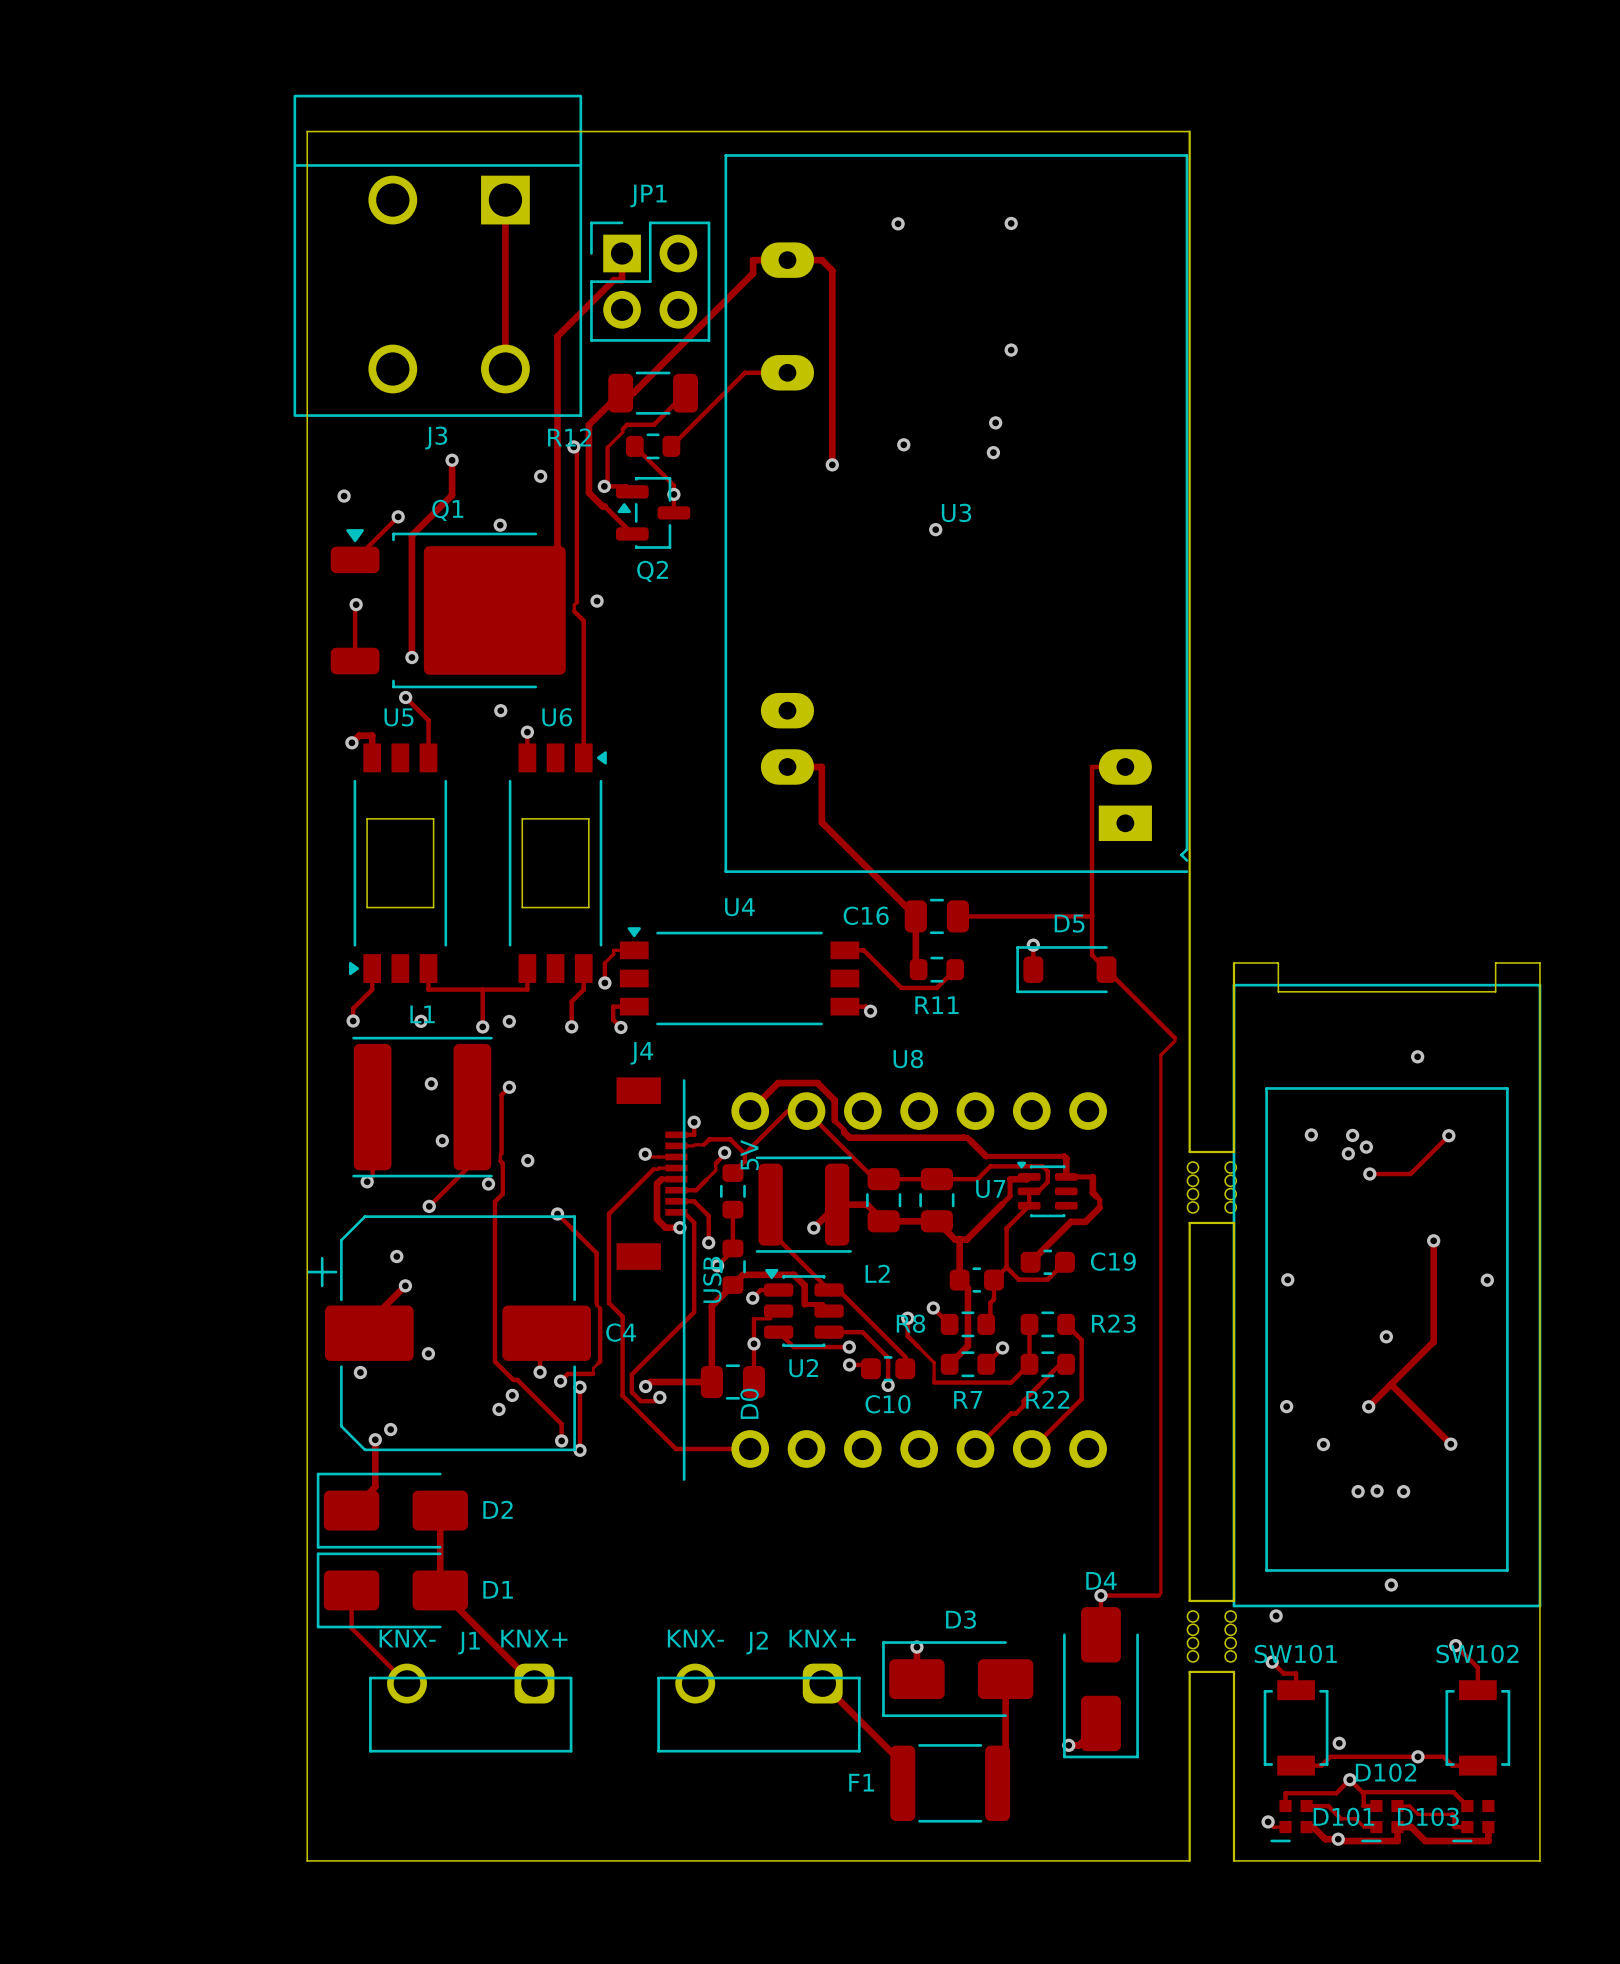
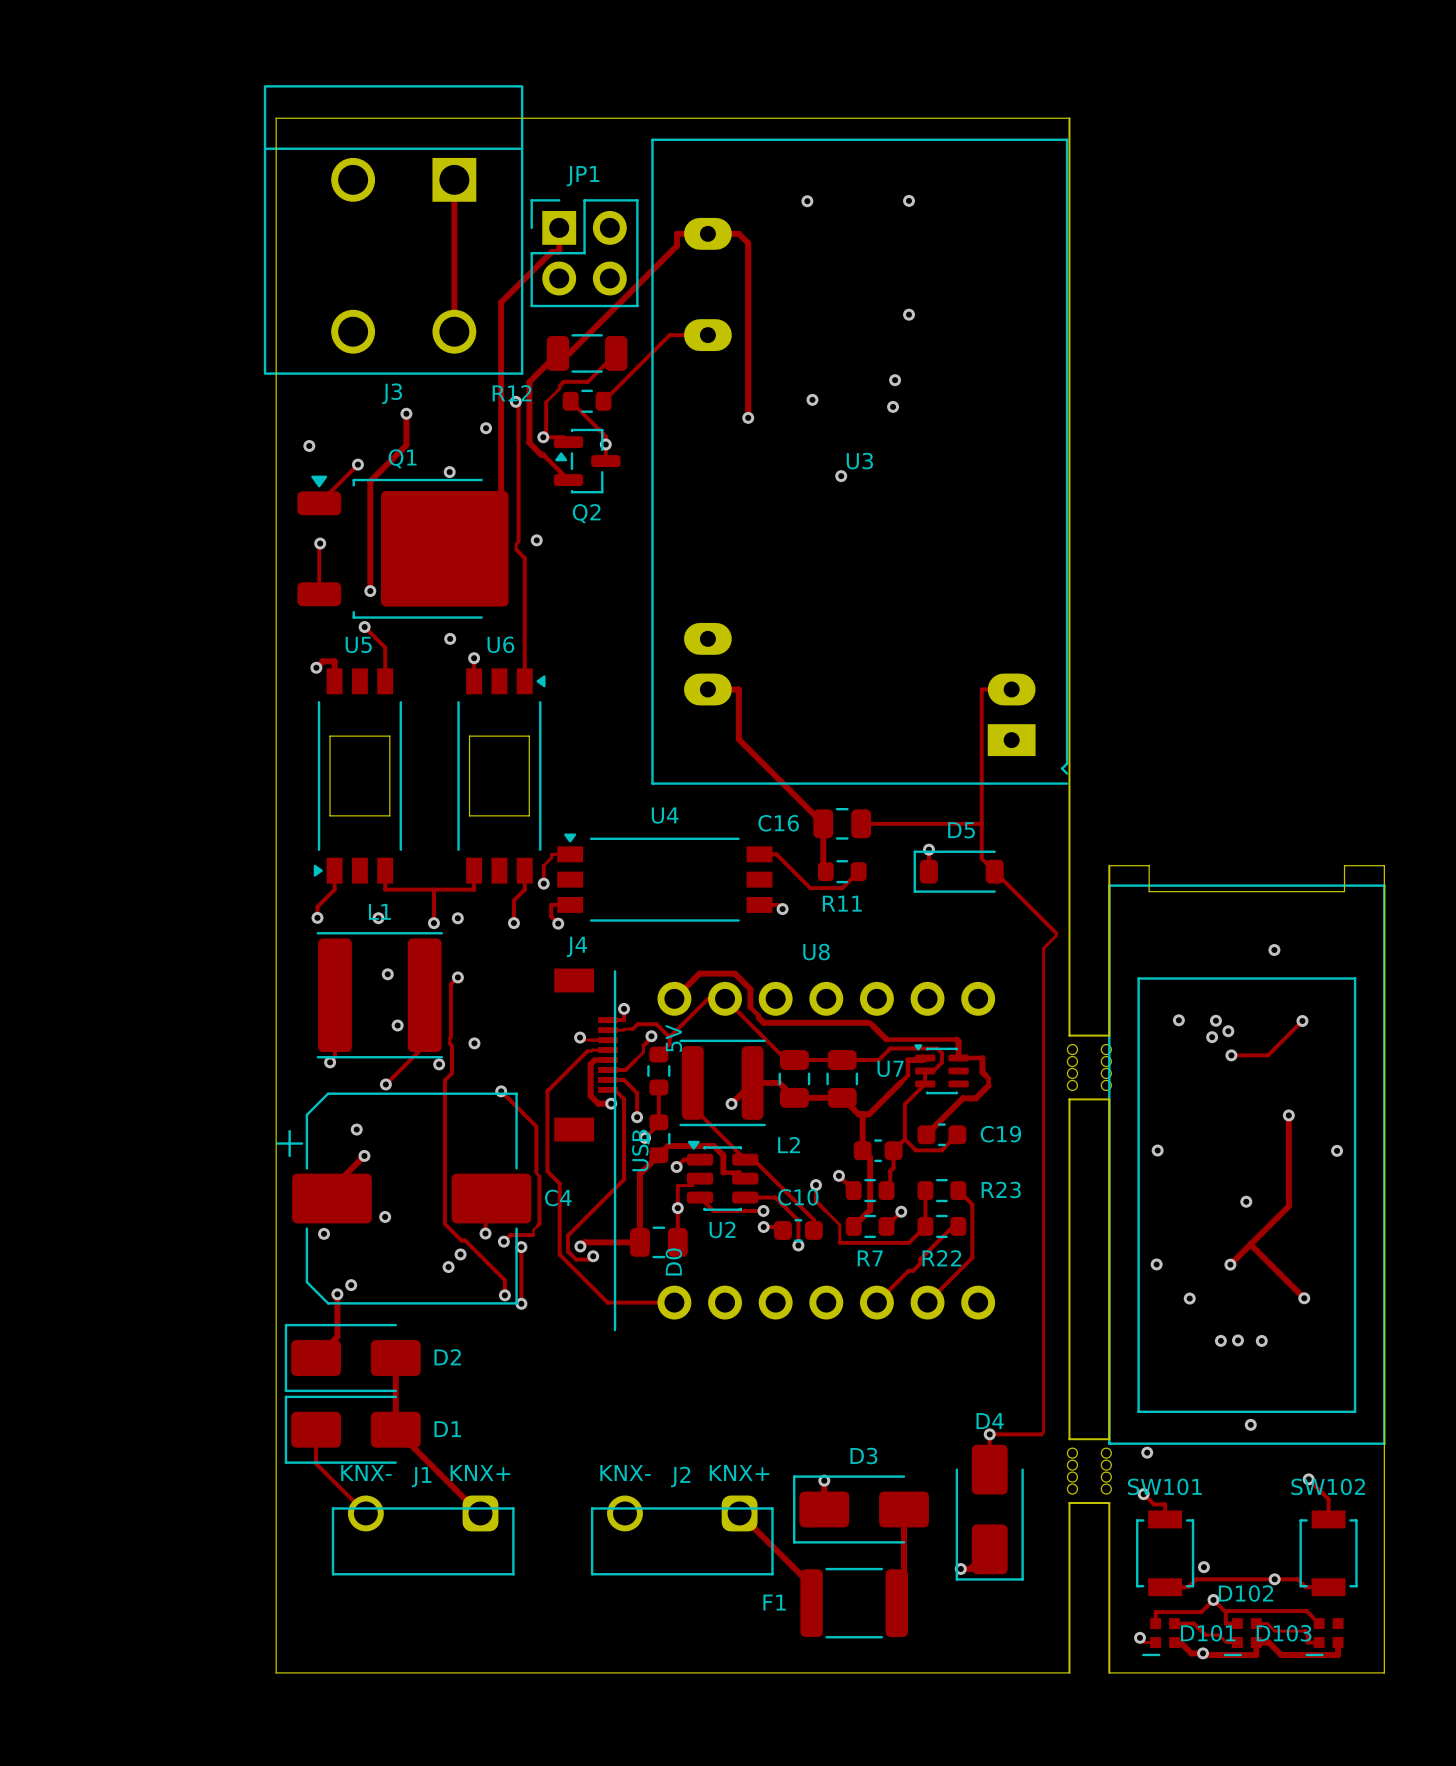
R8 name: R8 (910, 1323) -> none
C10 name position: C10 (888, 1404) -> C10 (798, 1197)

